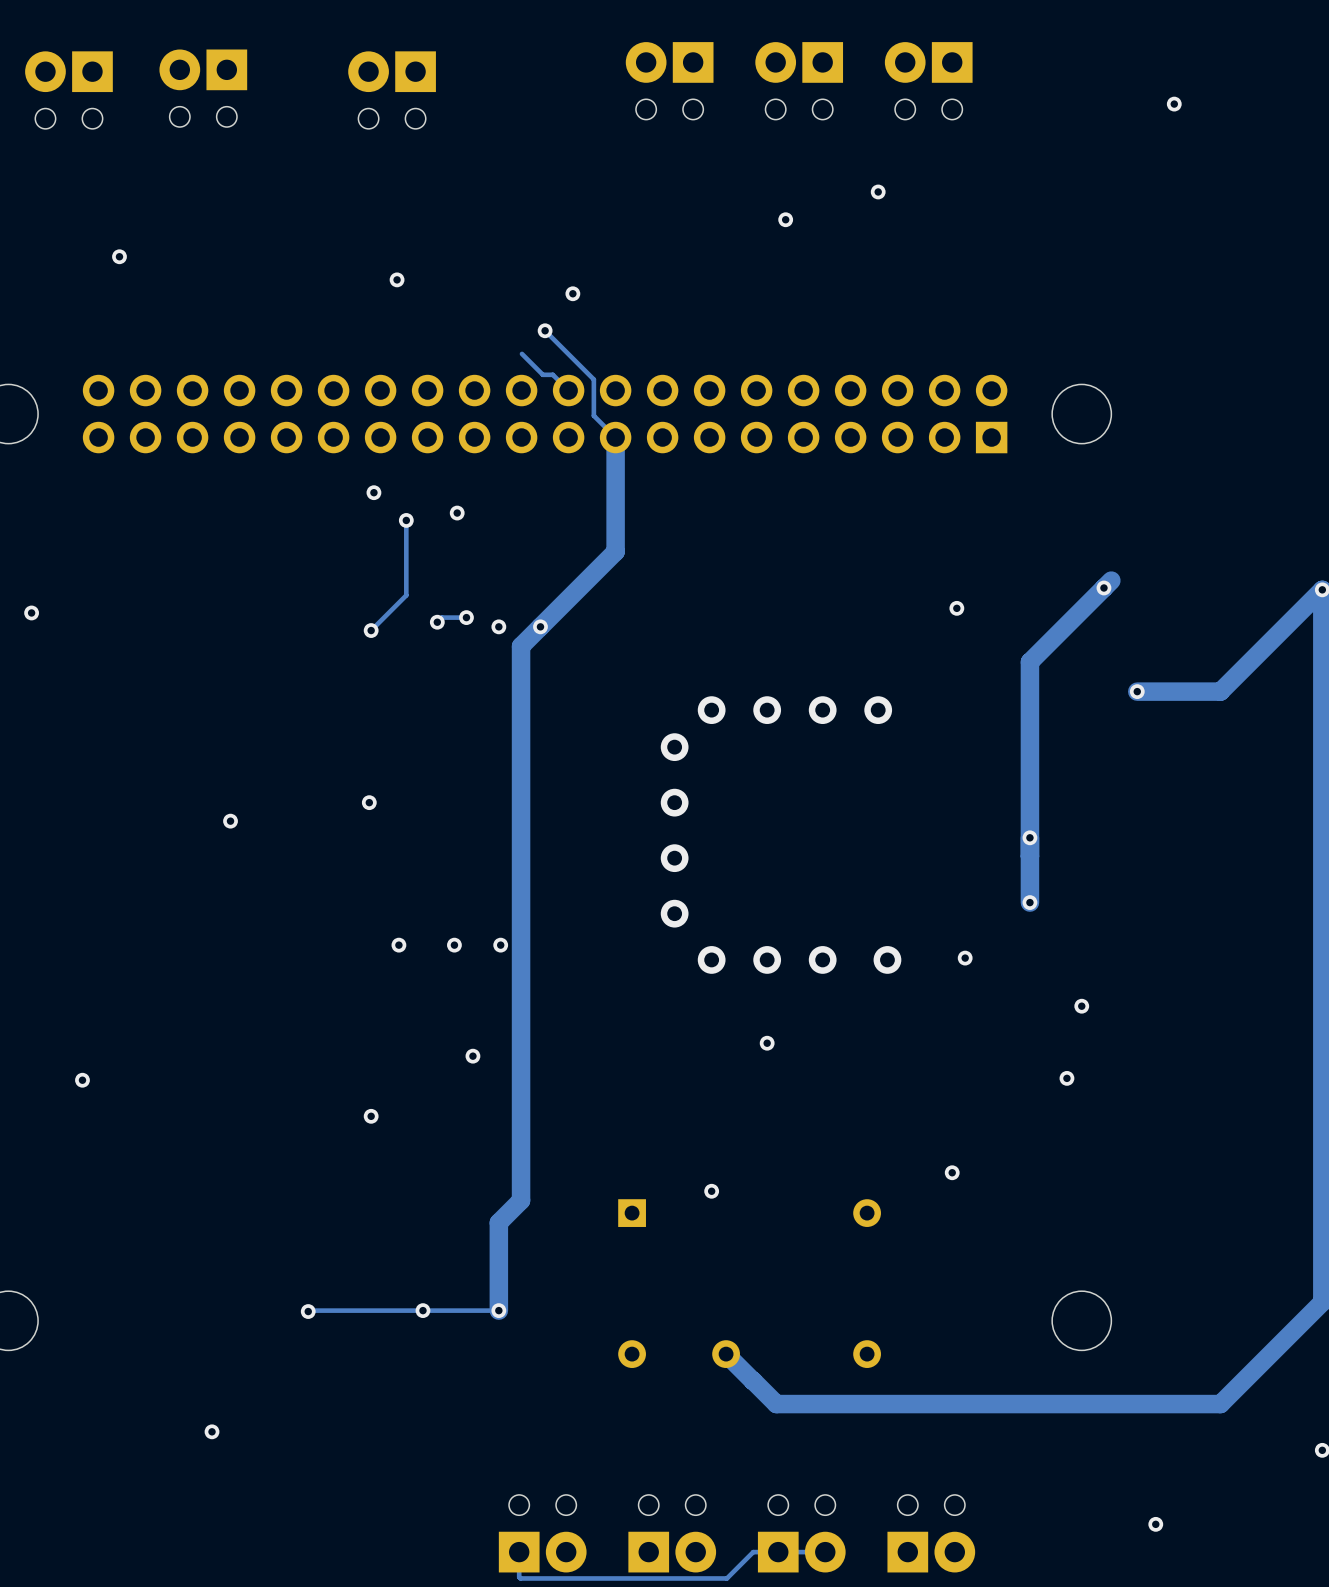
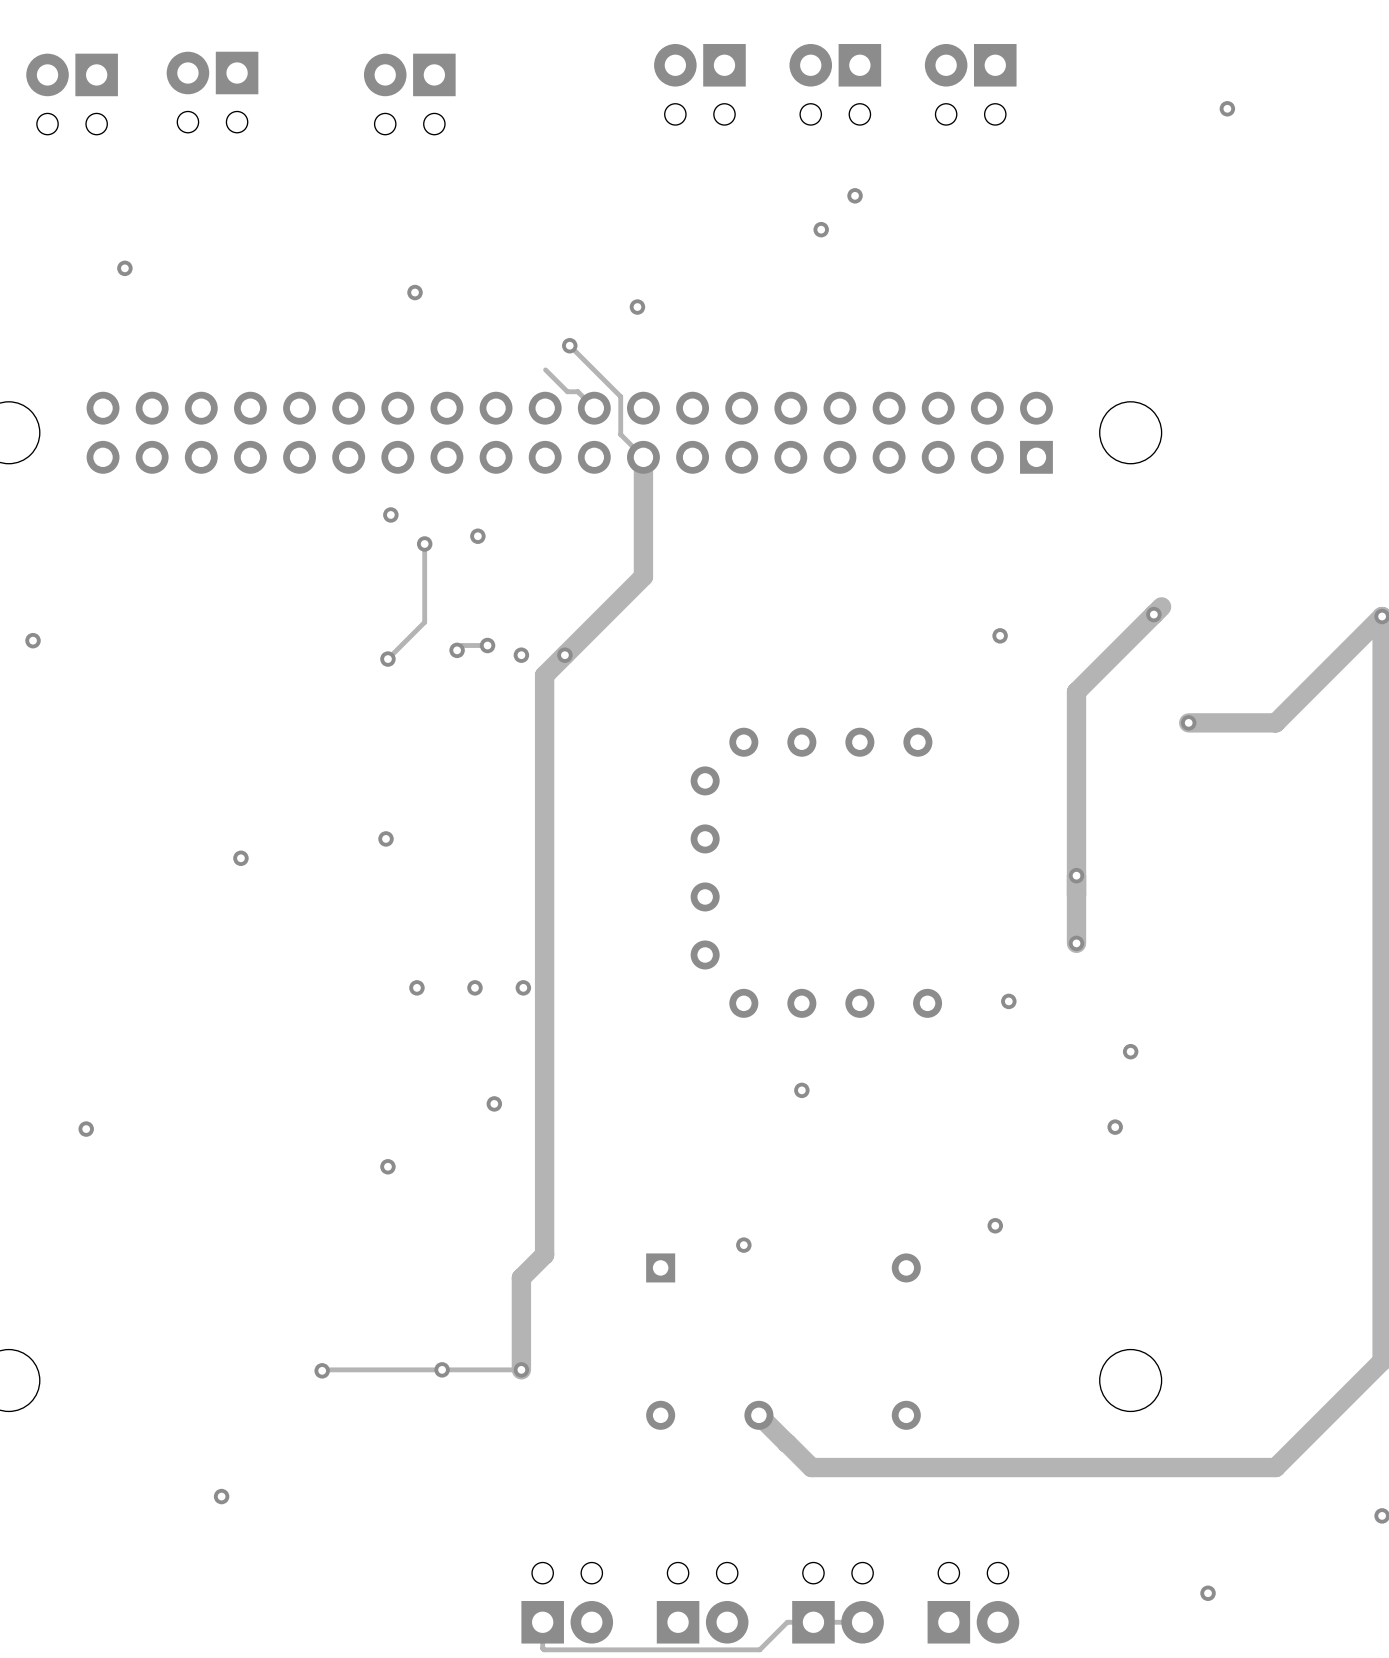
via position: (878, 191) -> (855, 195)
via position: (572, 293) -> (637, 307)

